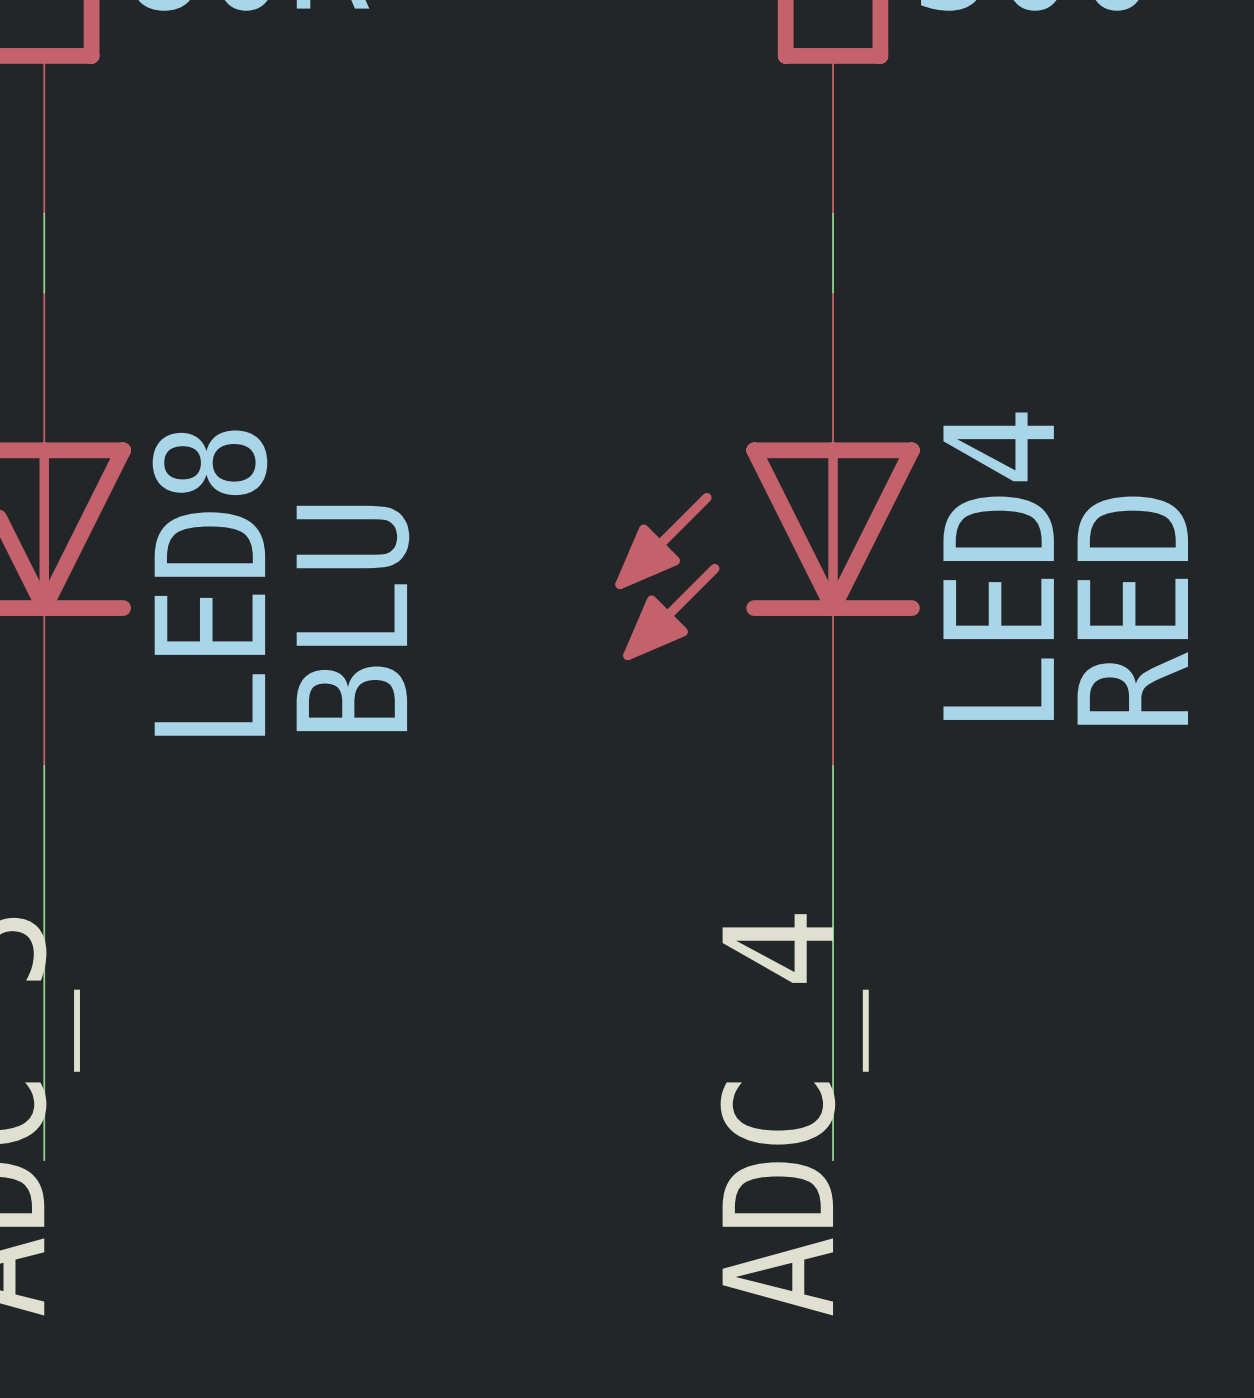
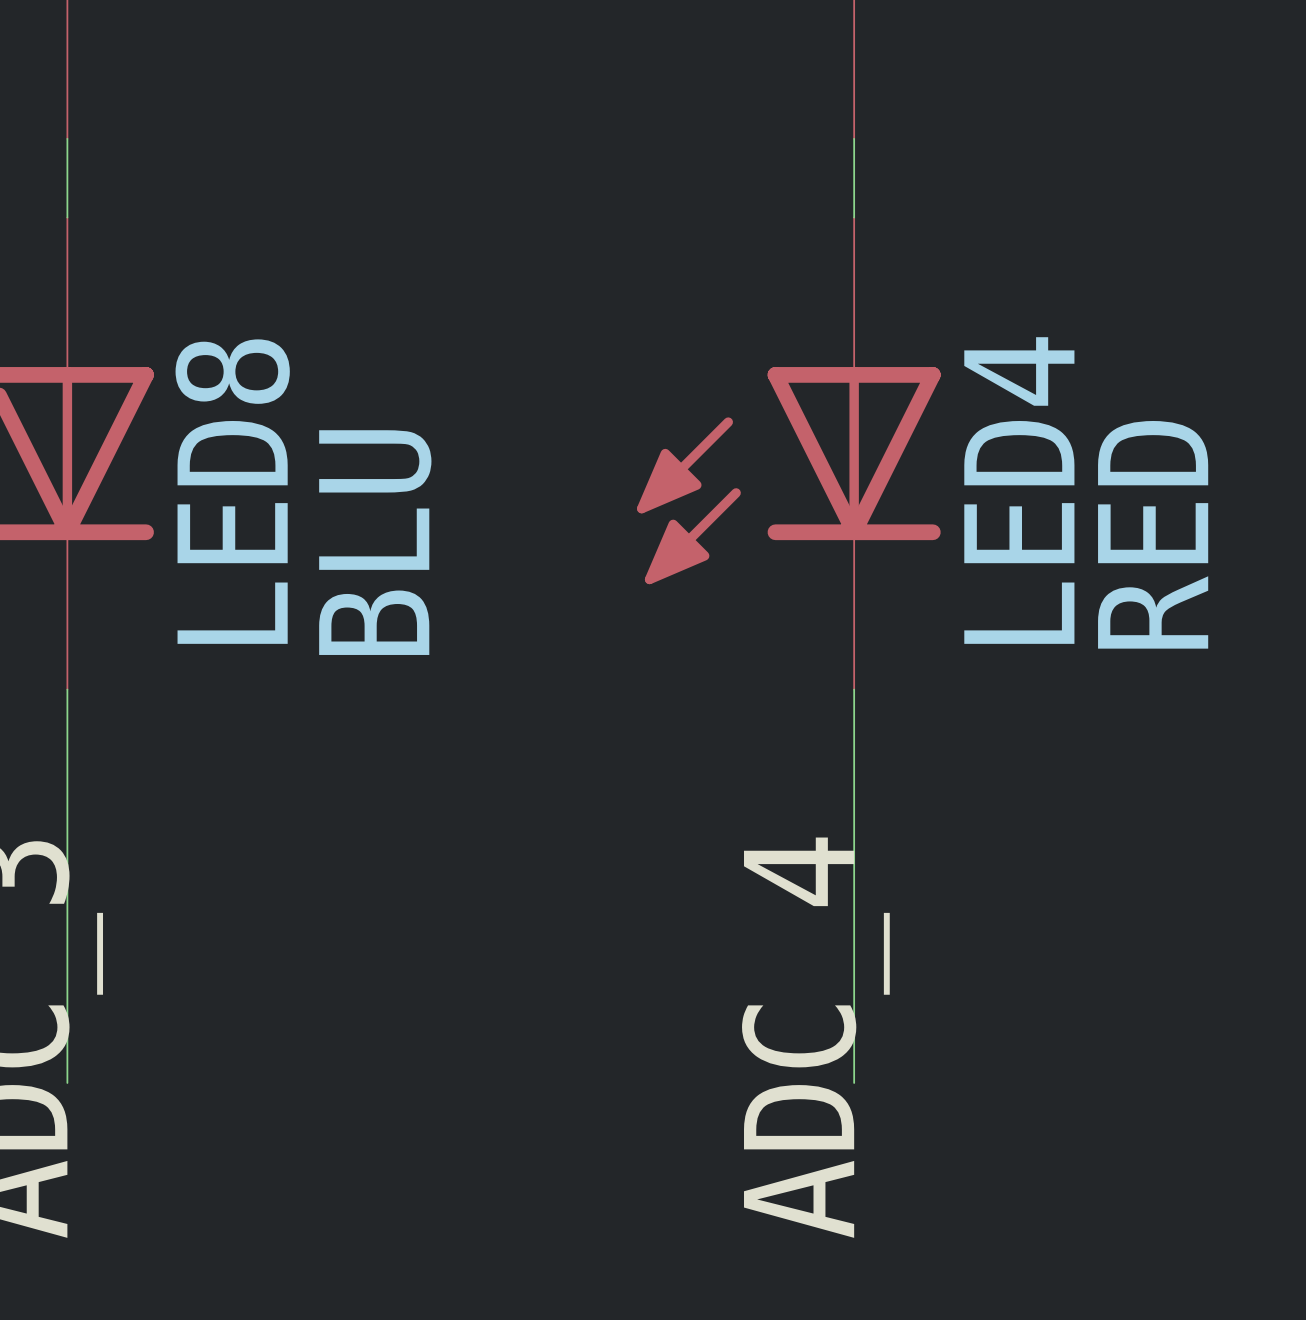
LED8 name position: LED8 (209, 583) -> LED8 (232, 491)

